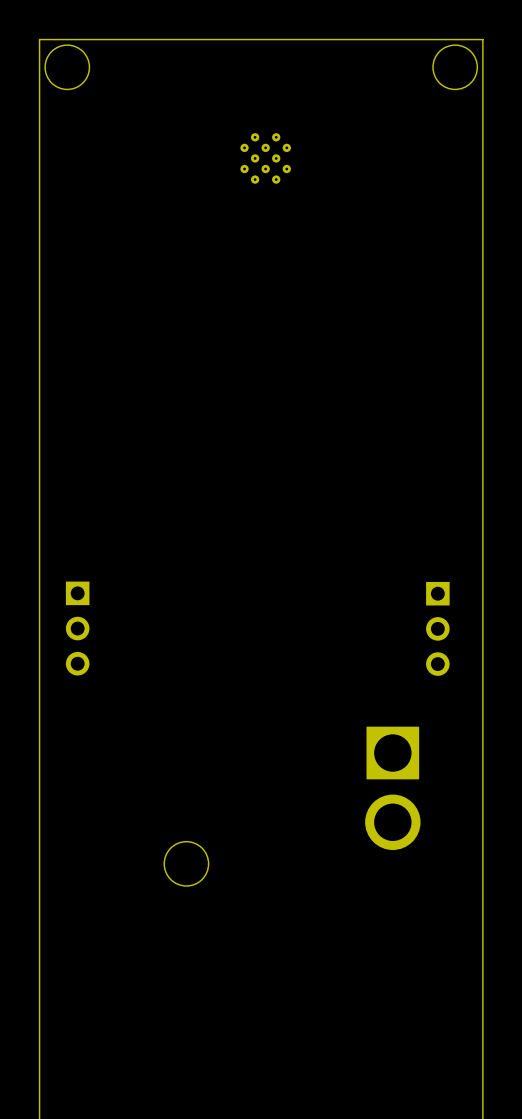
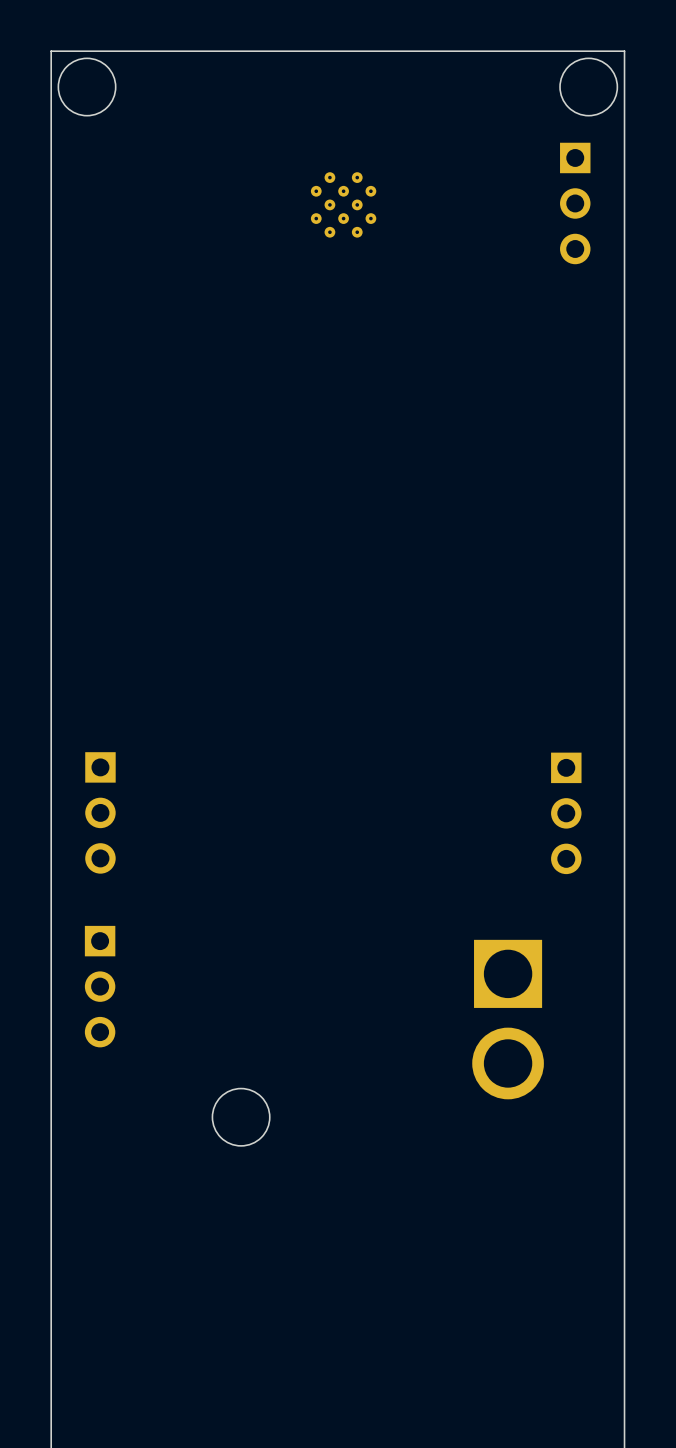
part: none -> (575, 203)
part: none -> (100, 986)

